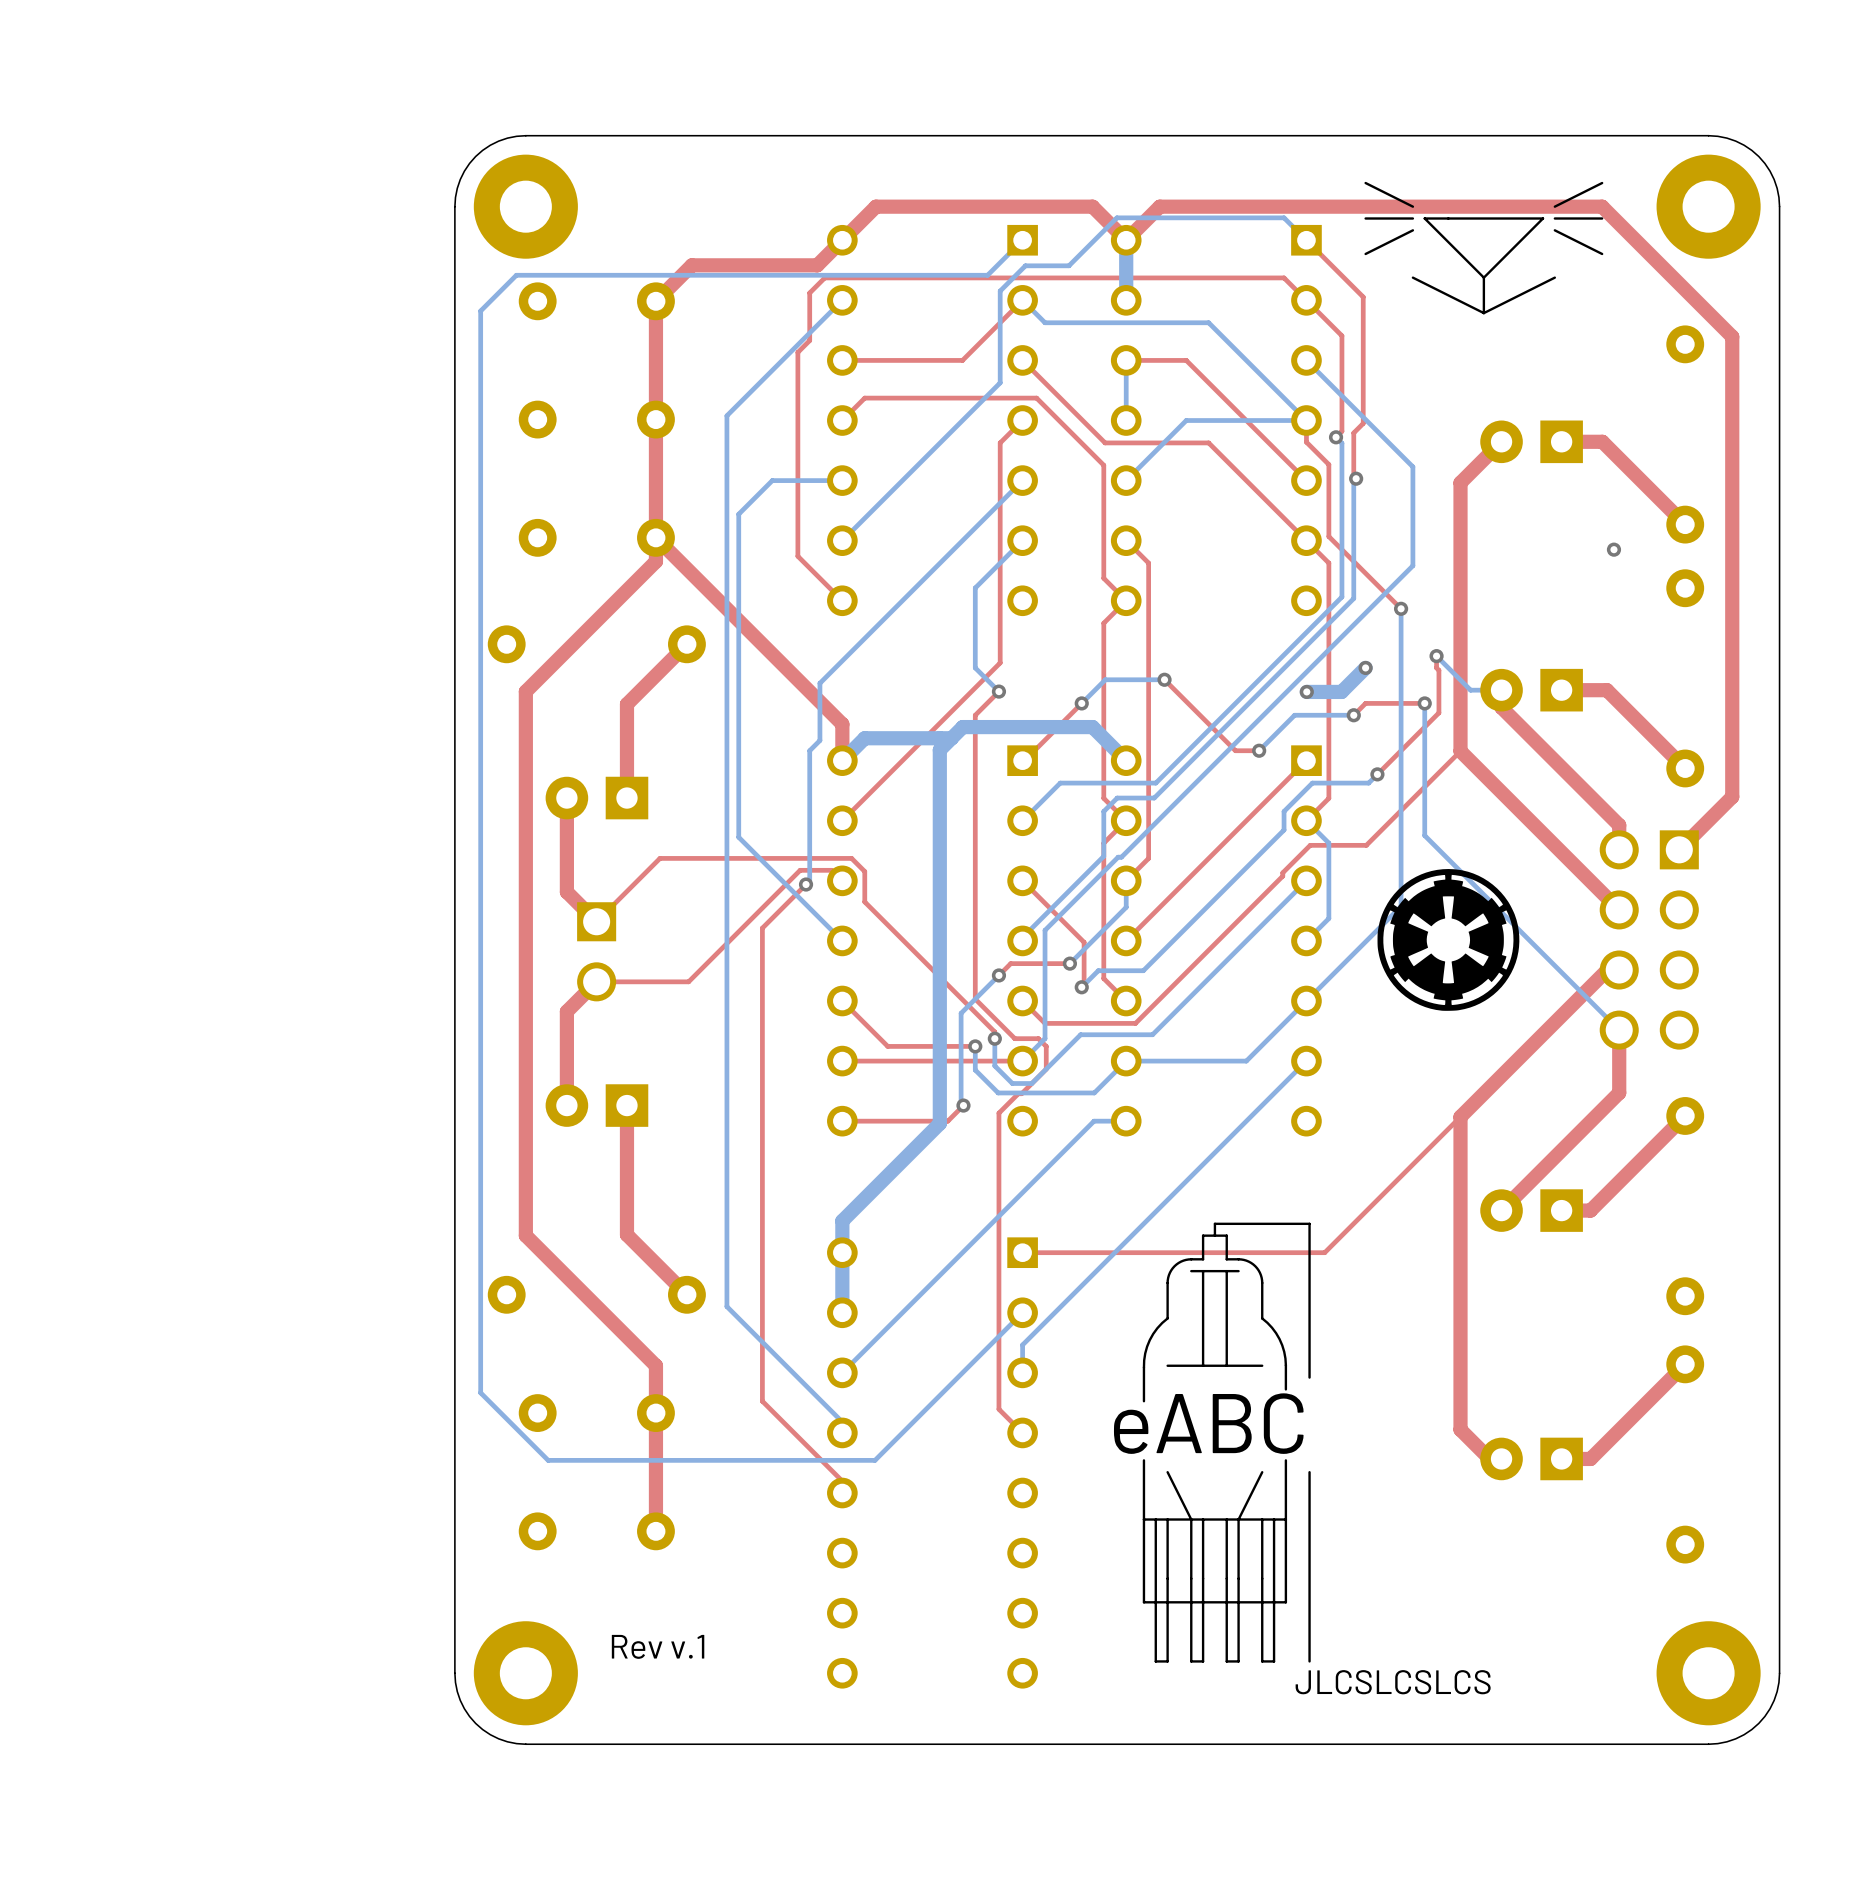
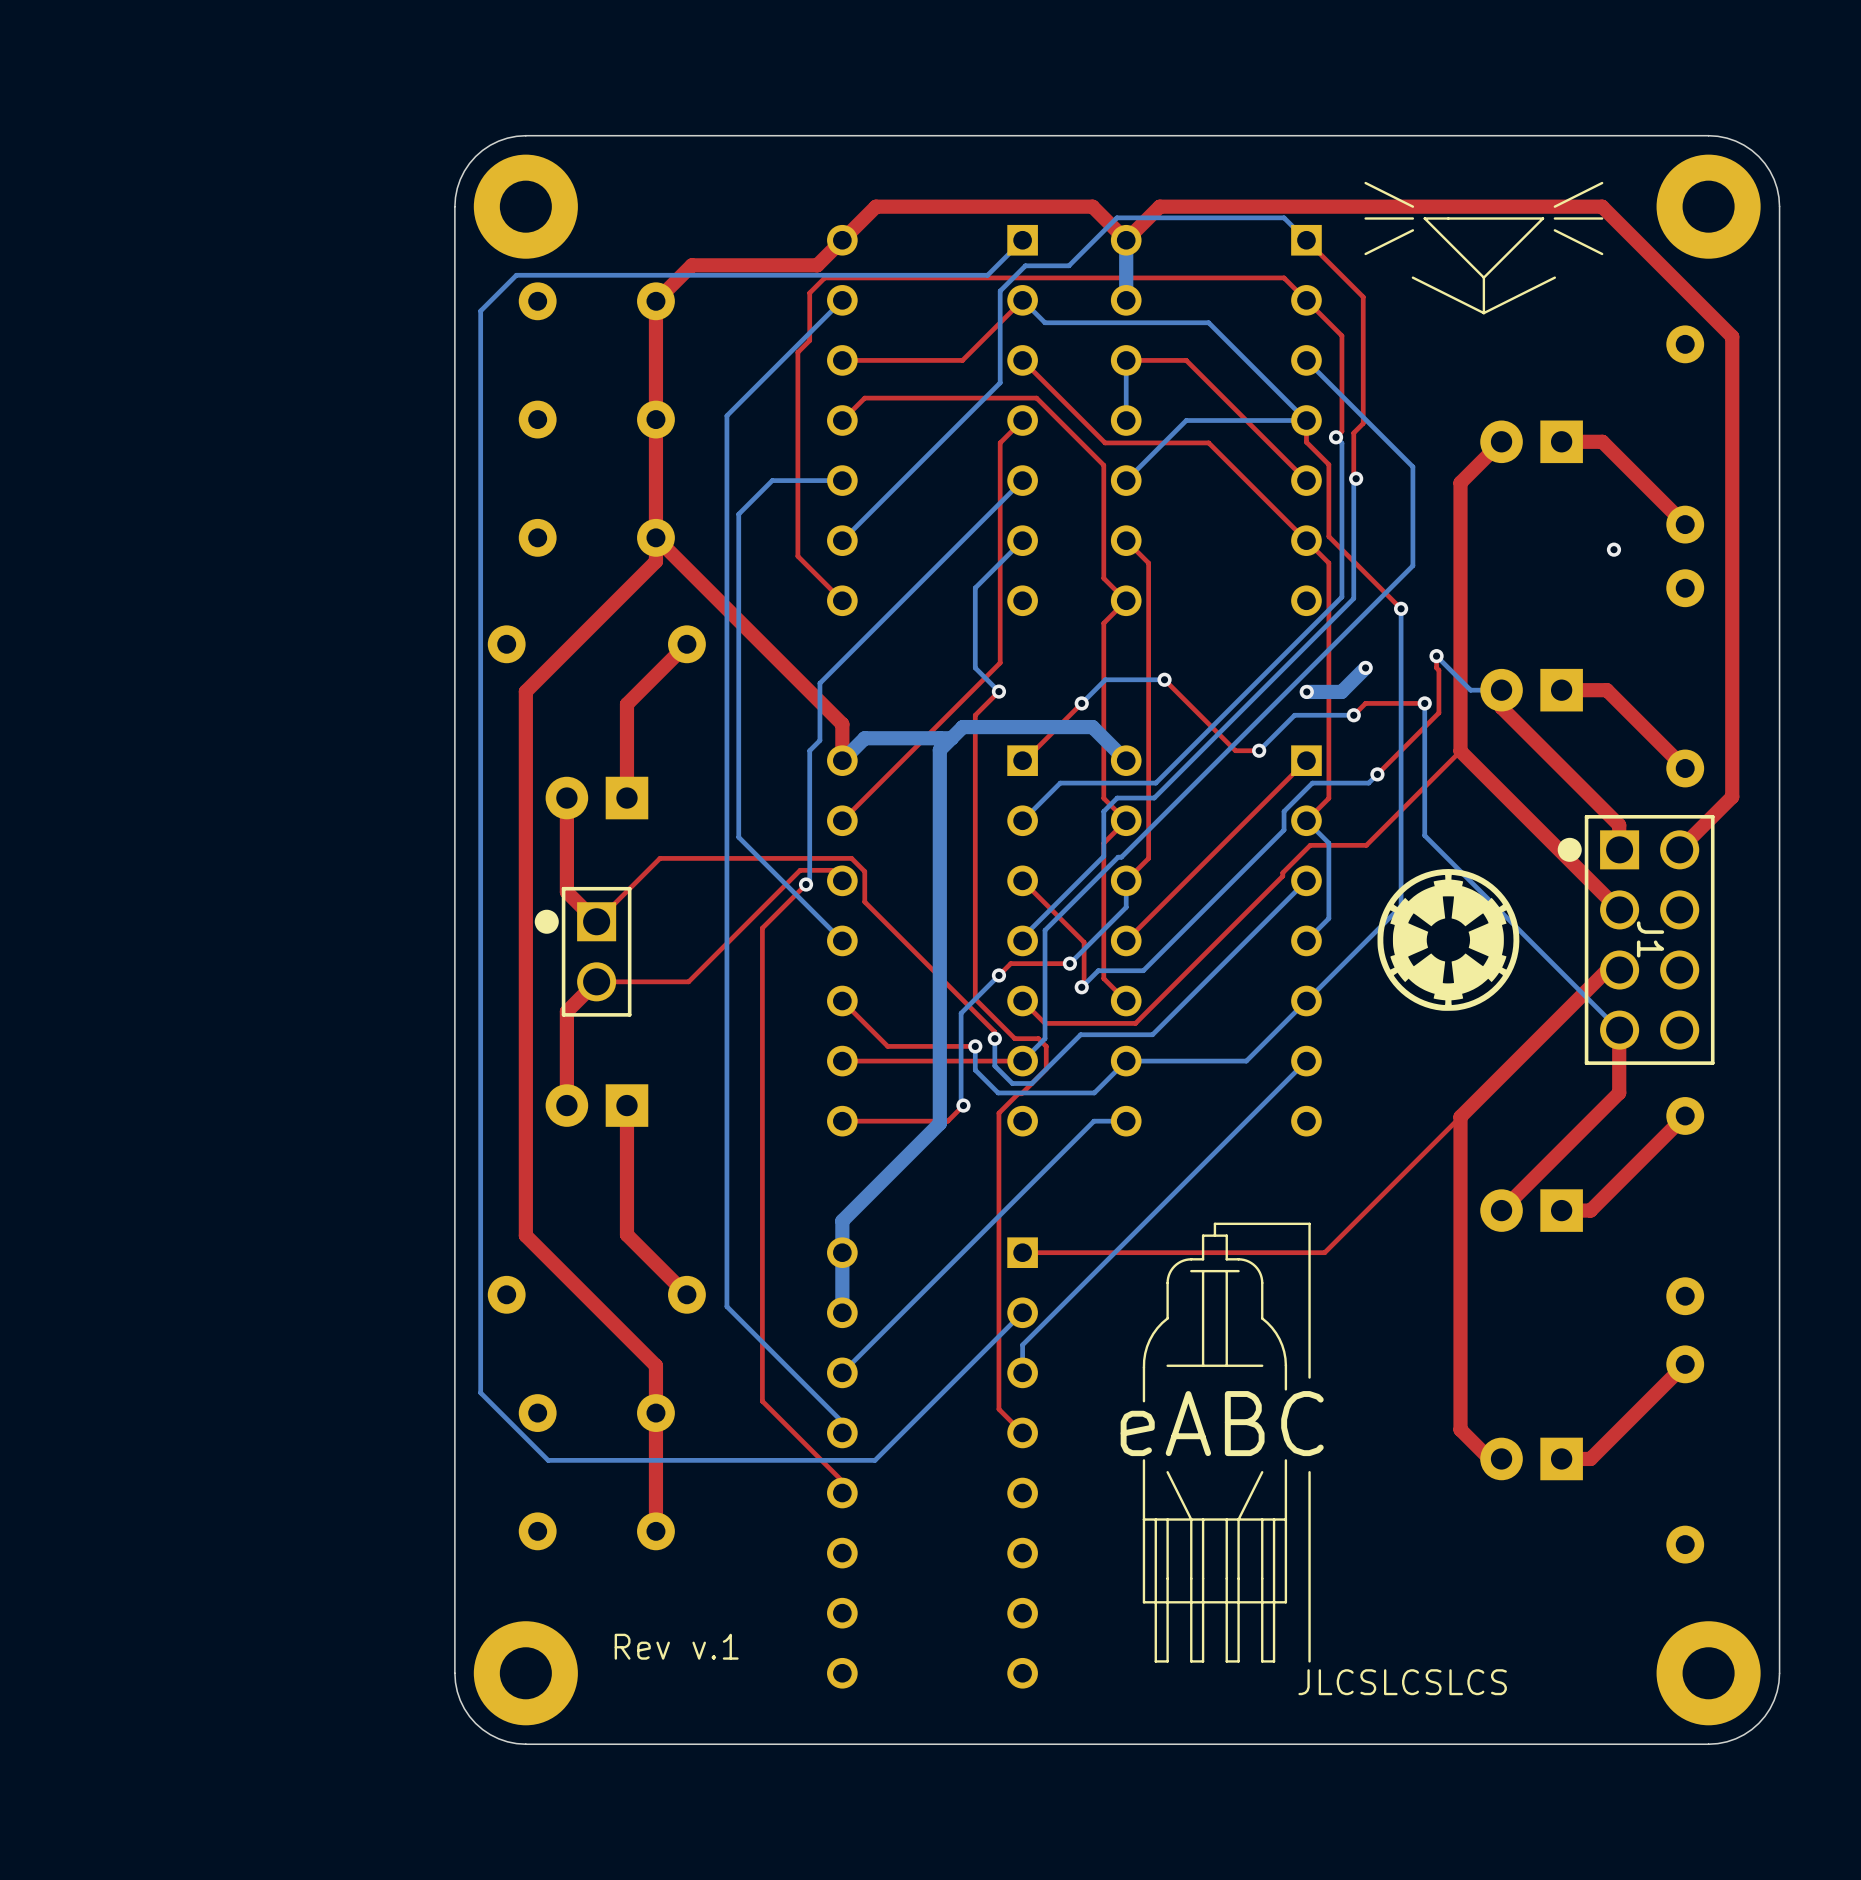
J1 side: top (1649, 939) -> bottom (1636, 939)
part side: top (596, 951) -> bottom (583, 951)

